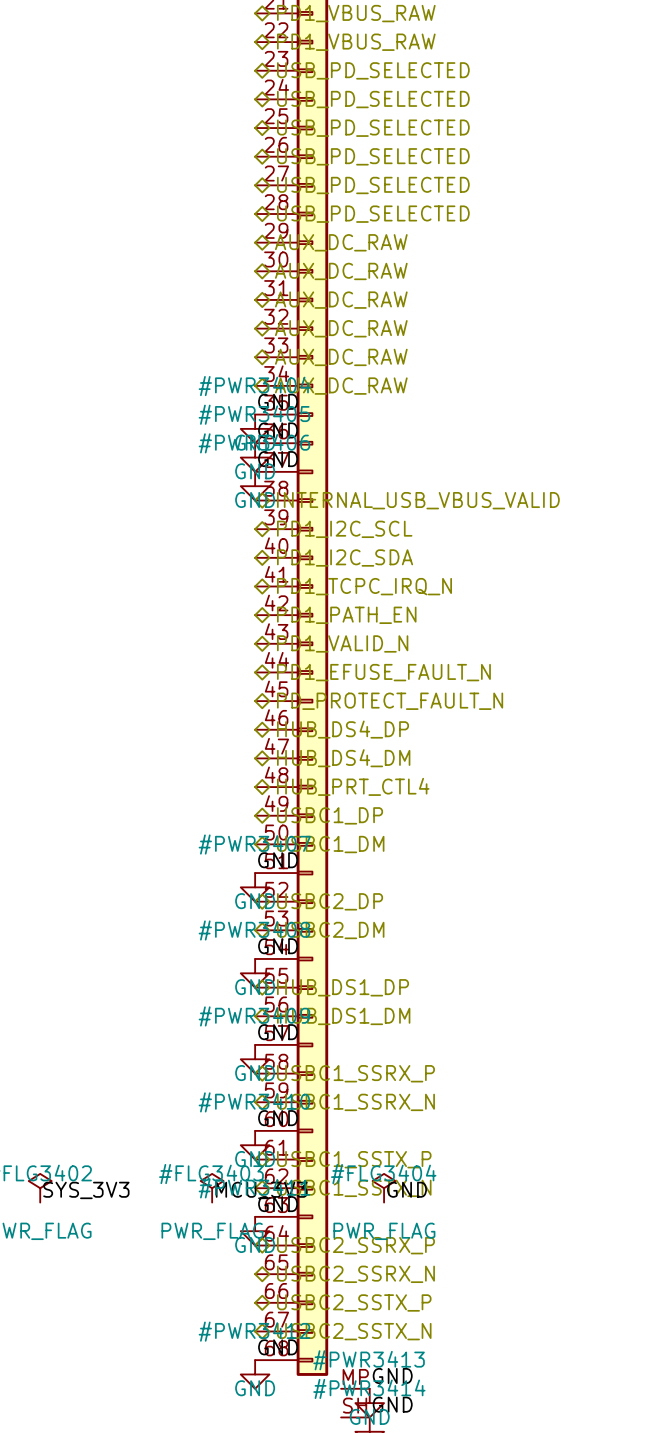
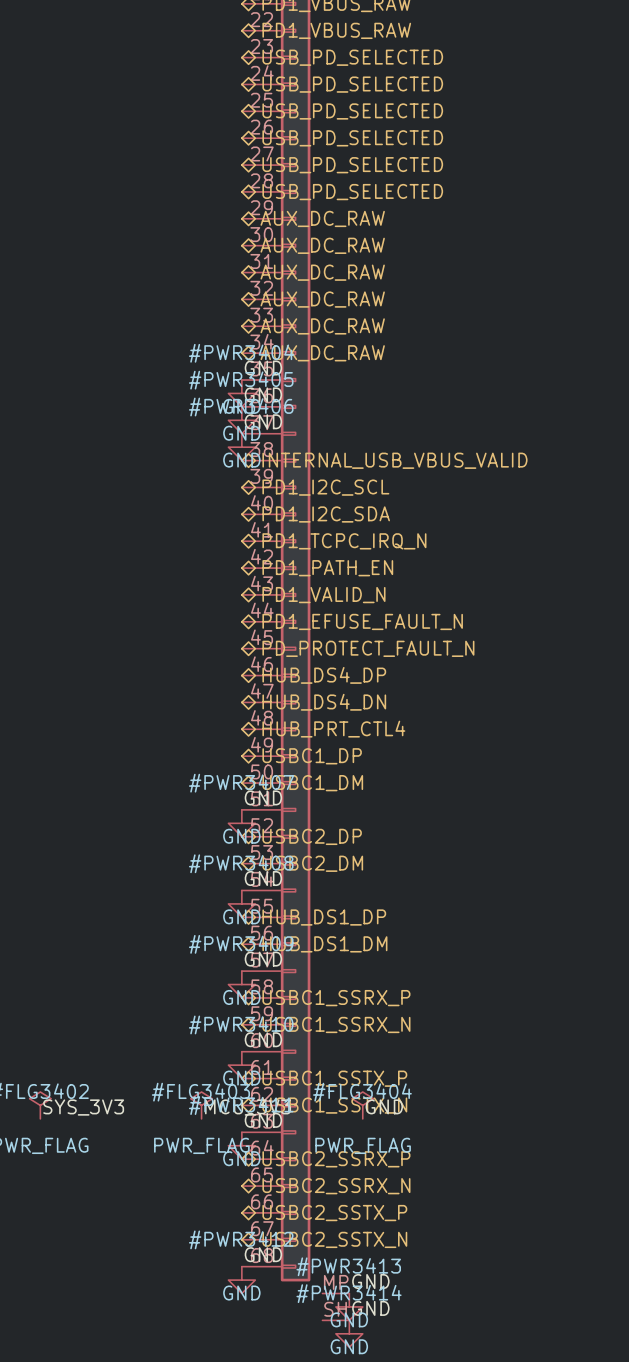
hierarchical label: HUB_DS4_DM (343, 758) -> HUB_DS4_DN (324, 702)

